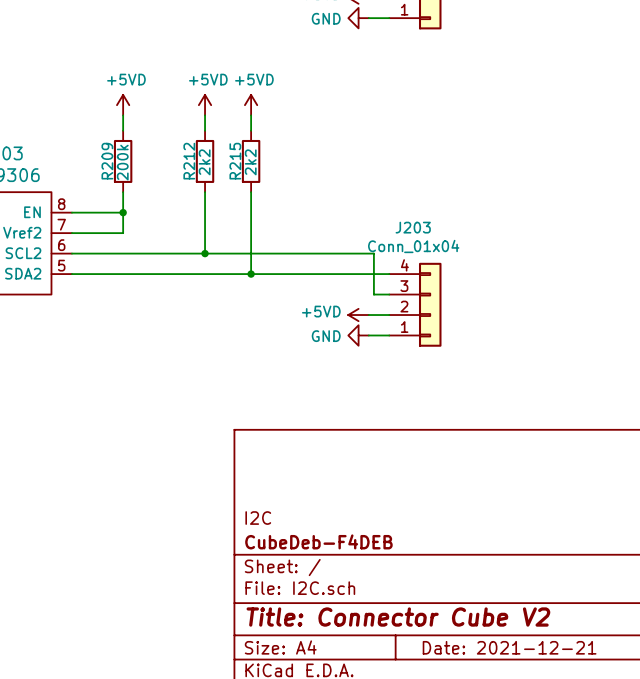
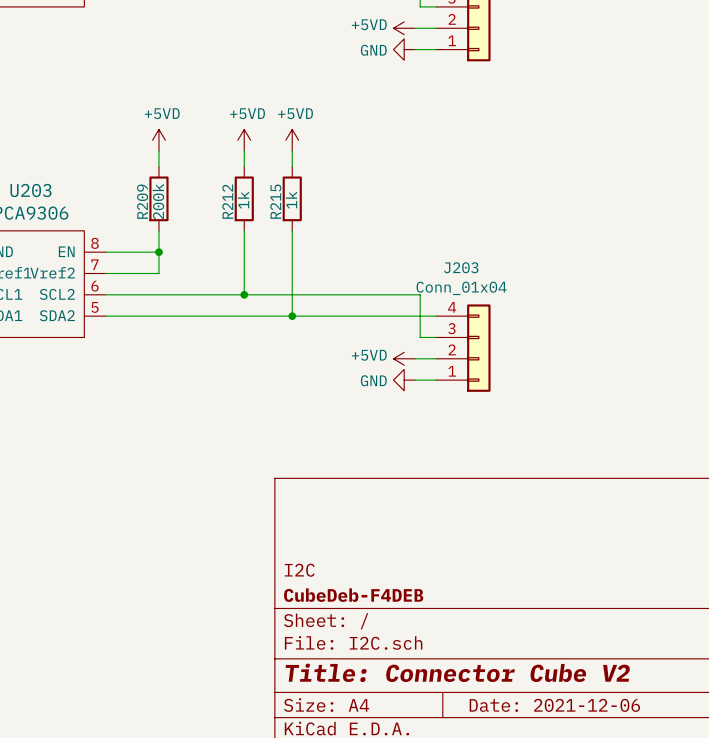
R212 value: 2k2 (204, 162) -> 1k (243, 200)
R215 value: 2k2 (250, 162) -> 1k (291, 200)
title block: Date: 2021-12-21 (509, 647) -> Date: 2021-12-06 (554, 705)

